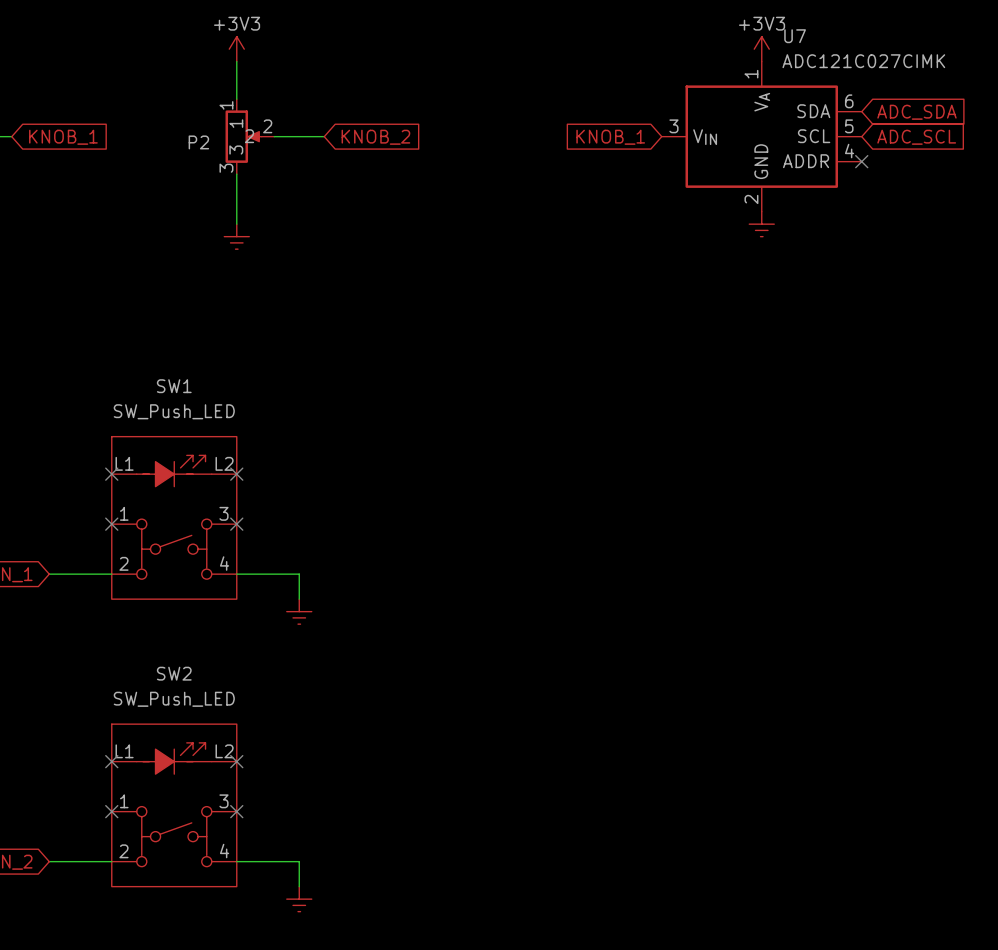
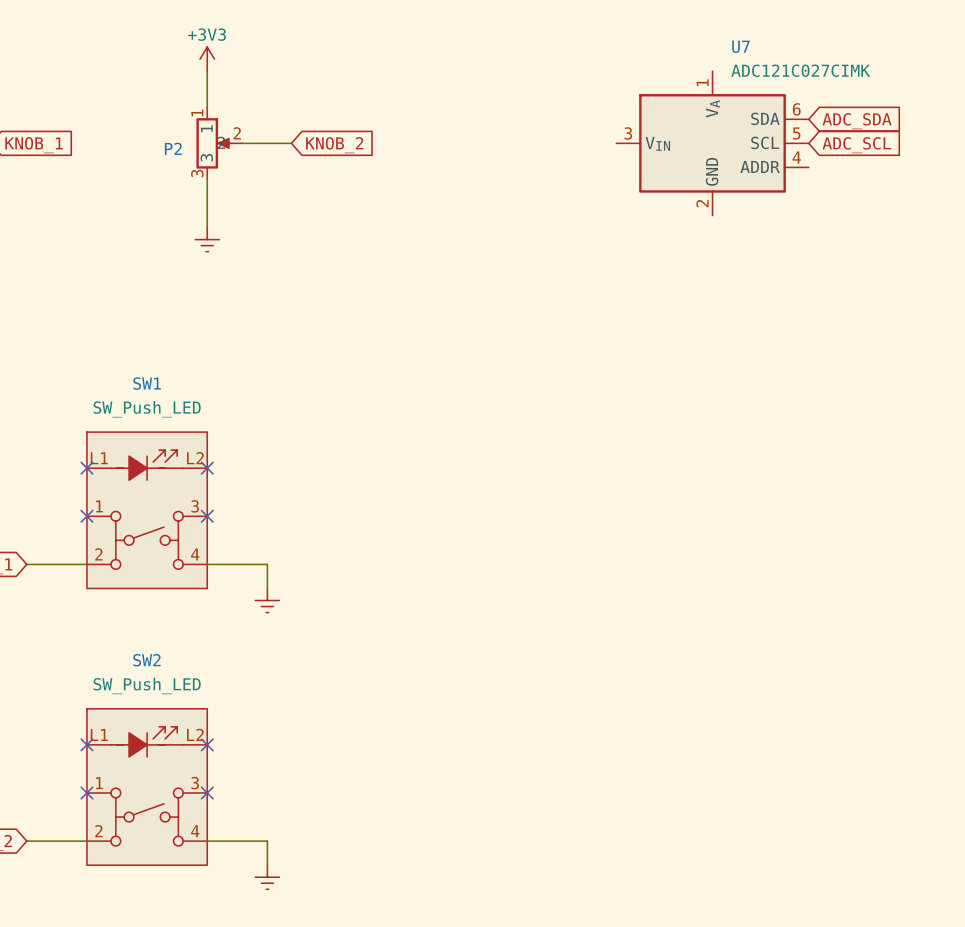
power symbol: +3V3 (761, 49) -> none
global label: KNOB_1 (610, 137) -> none
no-connect mark: (861, 161) -> none
power symbol: (761, 224) -> none

